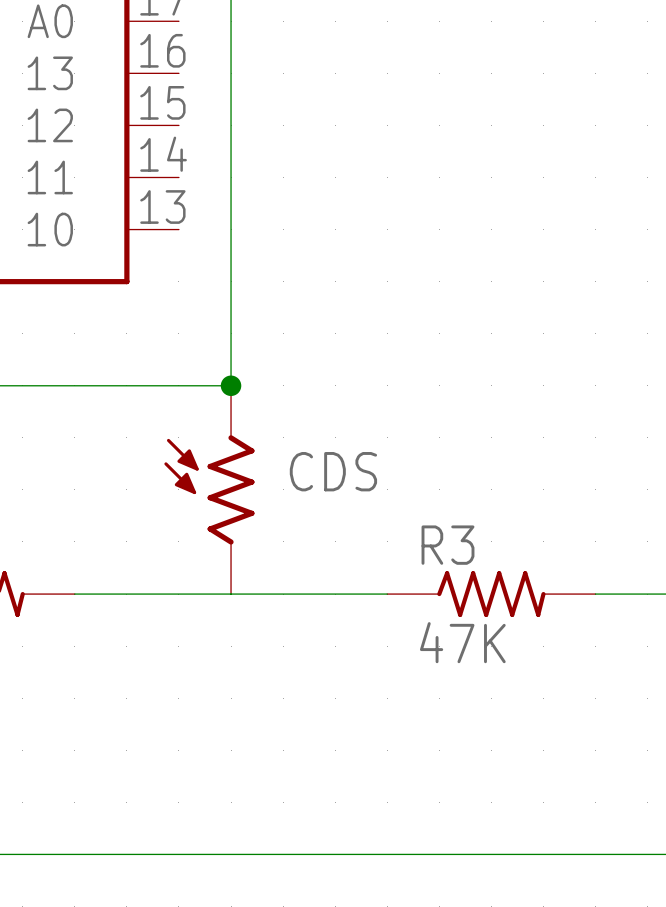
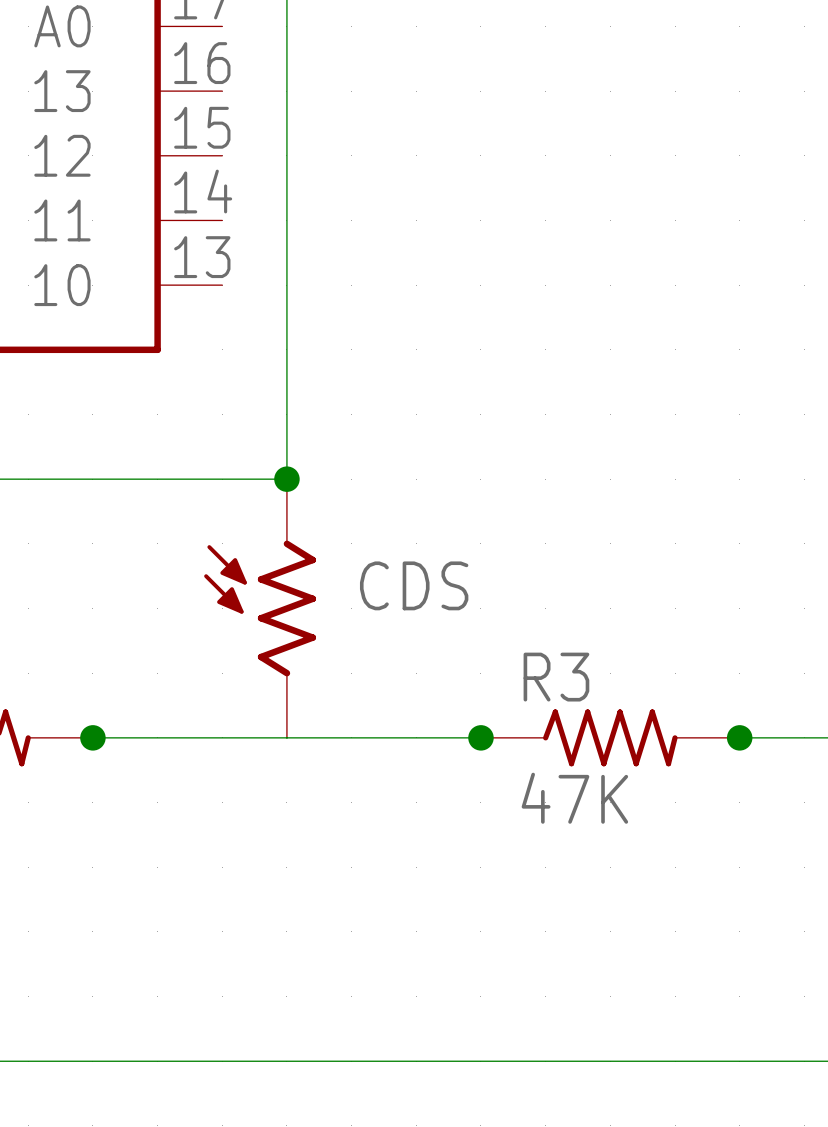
junction: none -> (92, 737)
junction: none -> (480, 737)
junction: none -> (739, 737)

